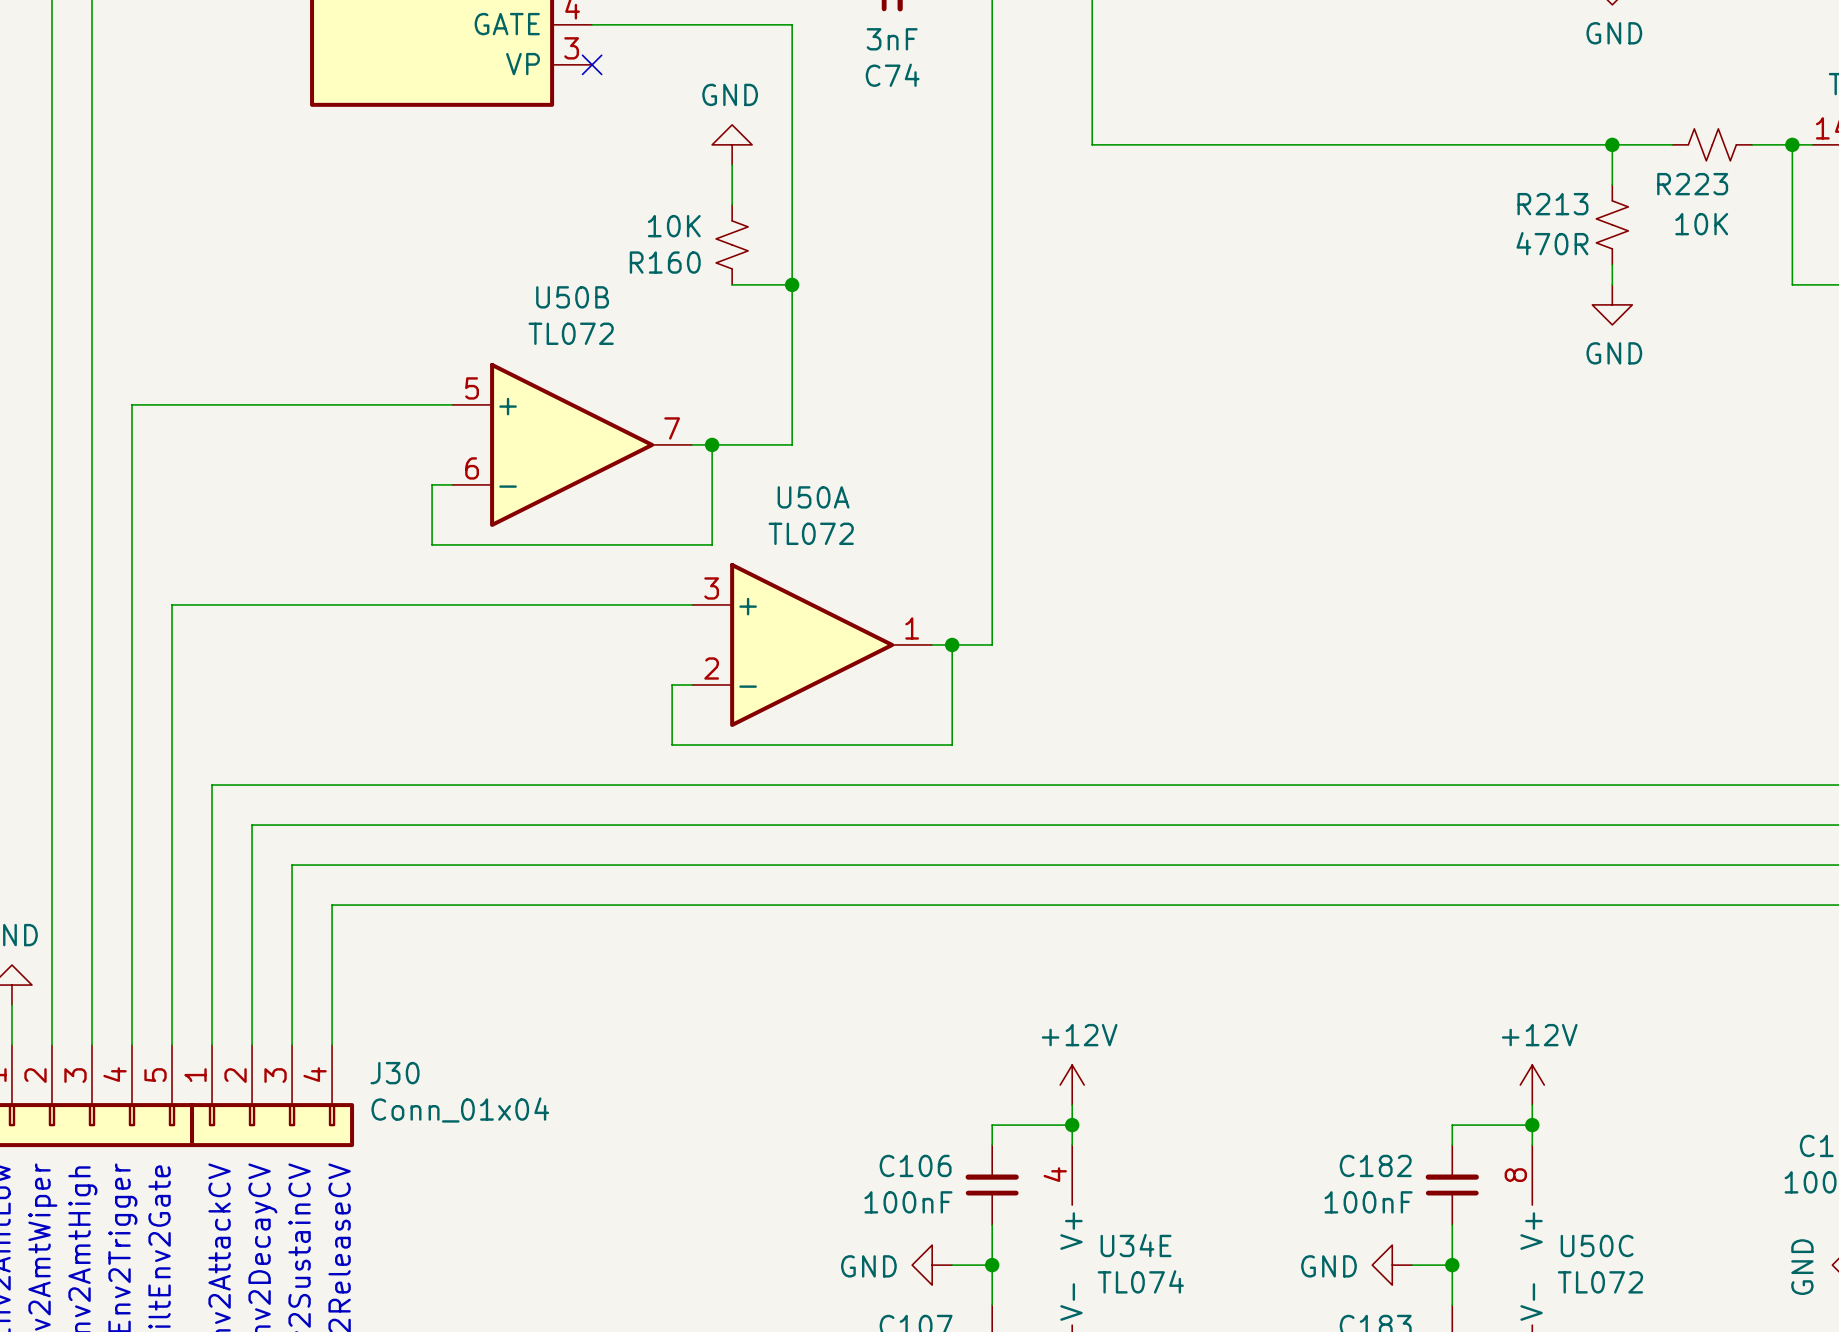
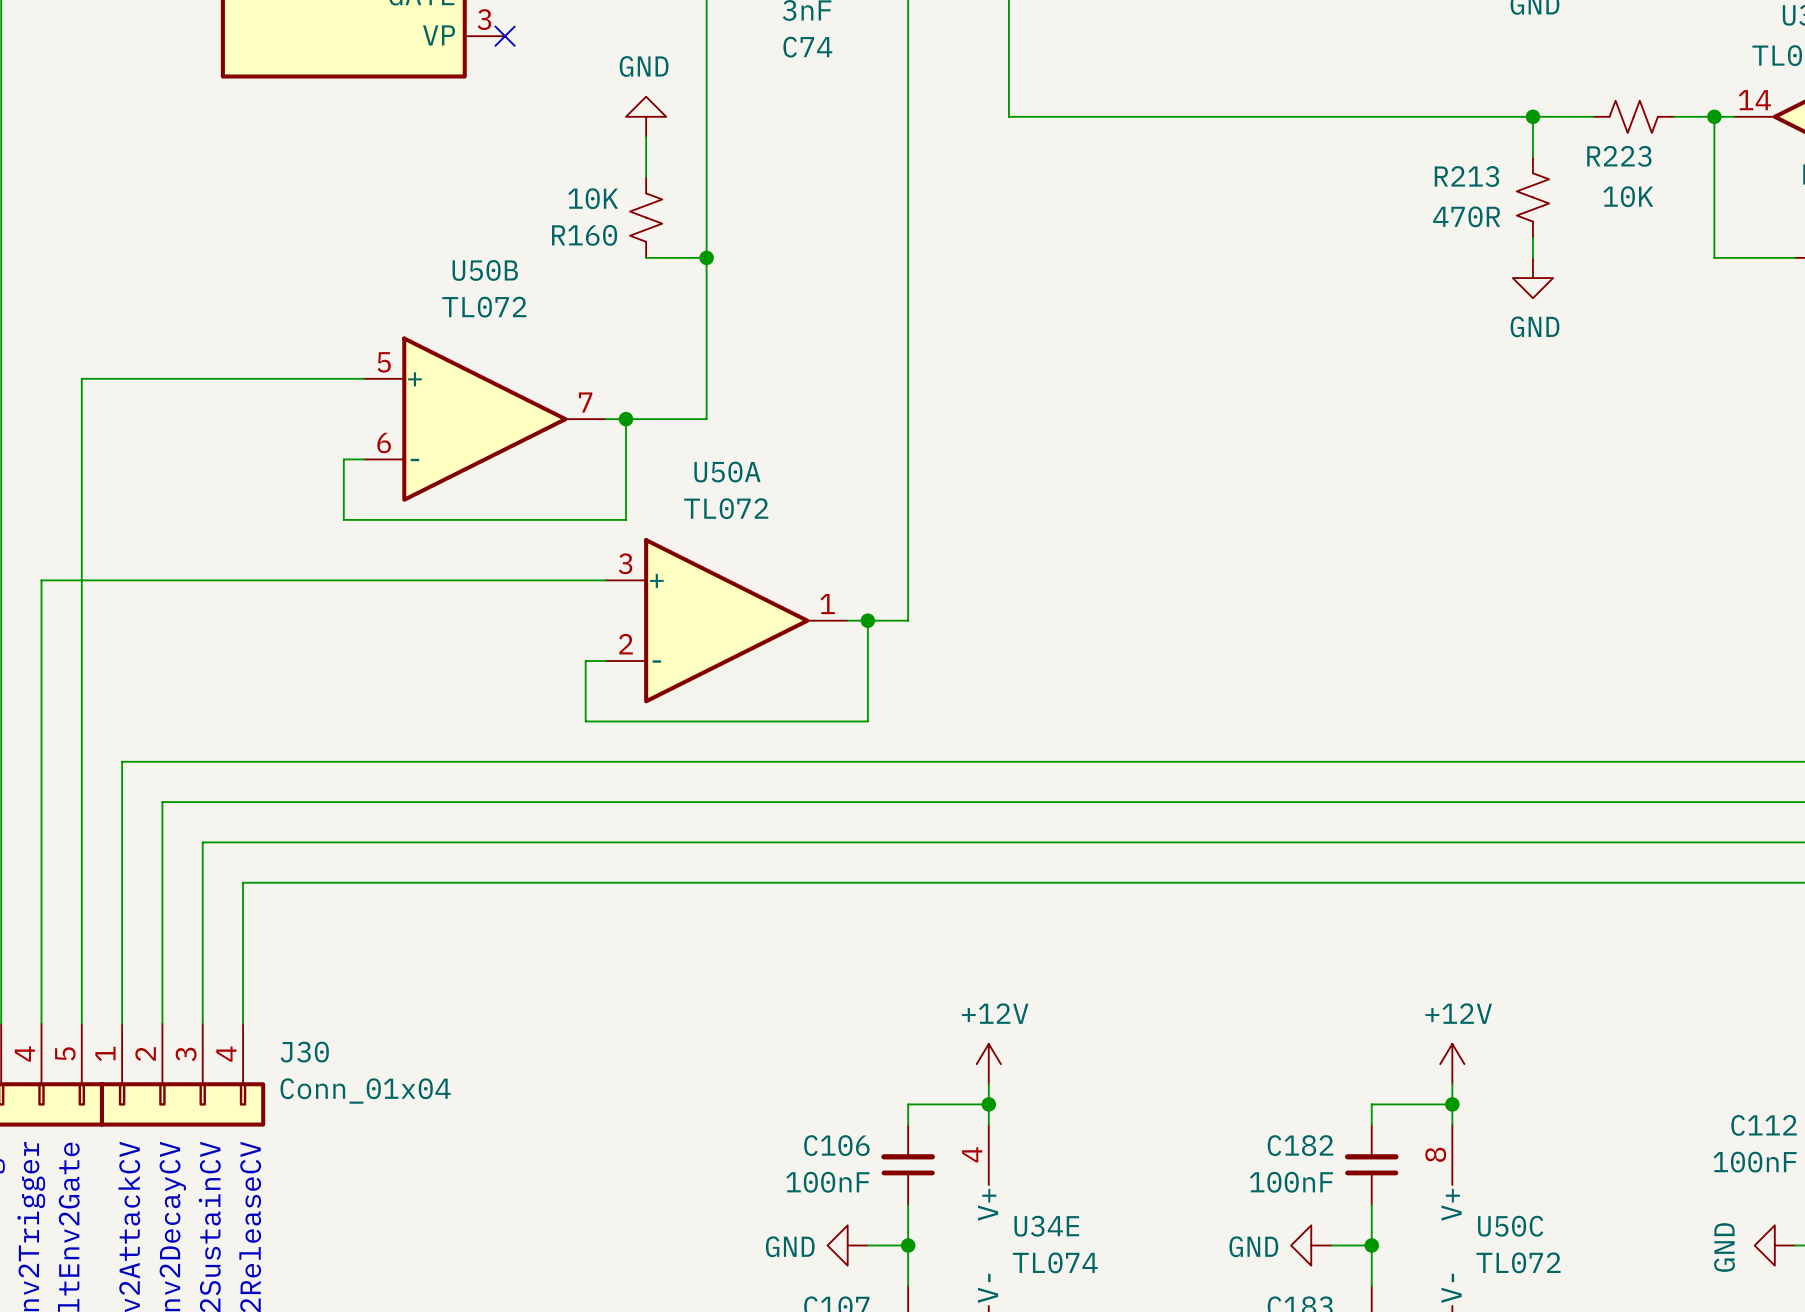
wire: (172, 404) (132, 404) (132, 604) -> (81, 378) (81, 580) (41, 580)

